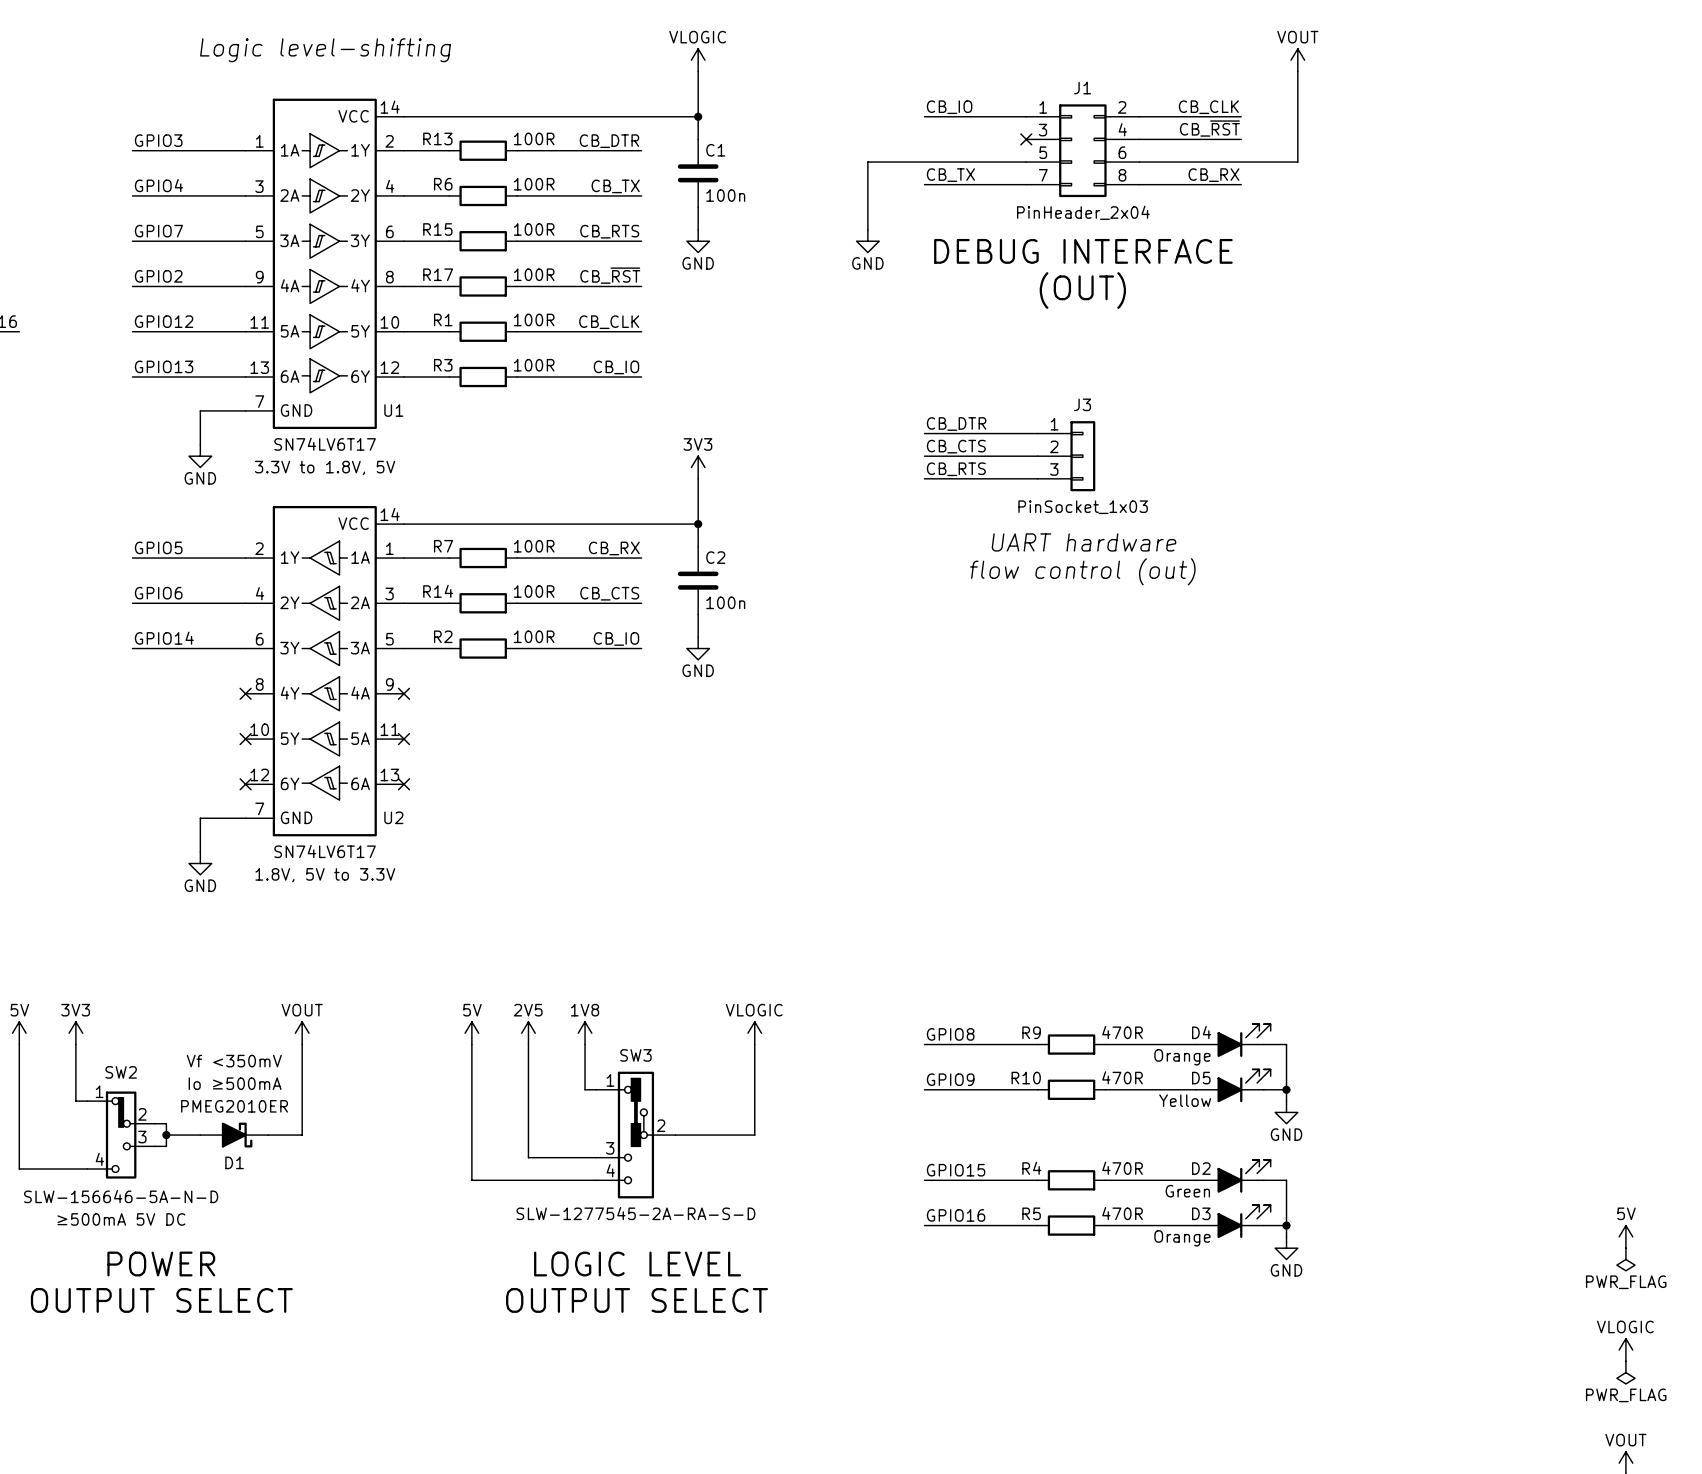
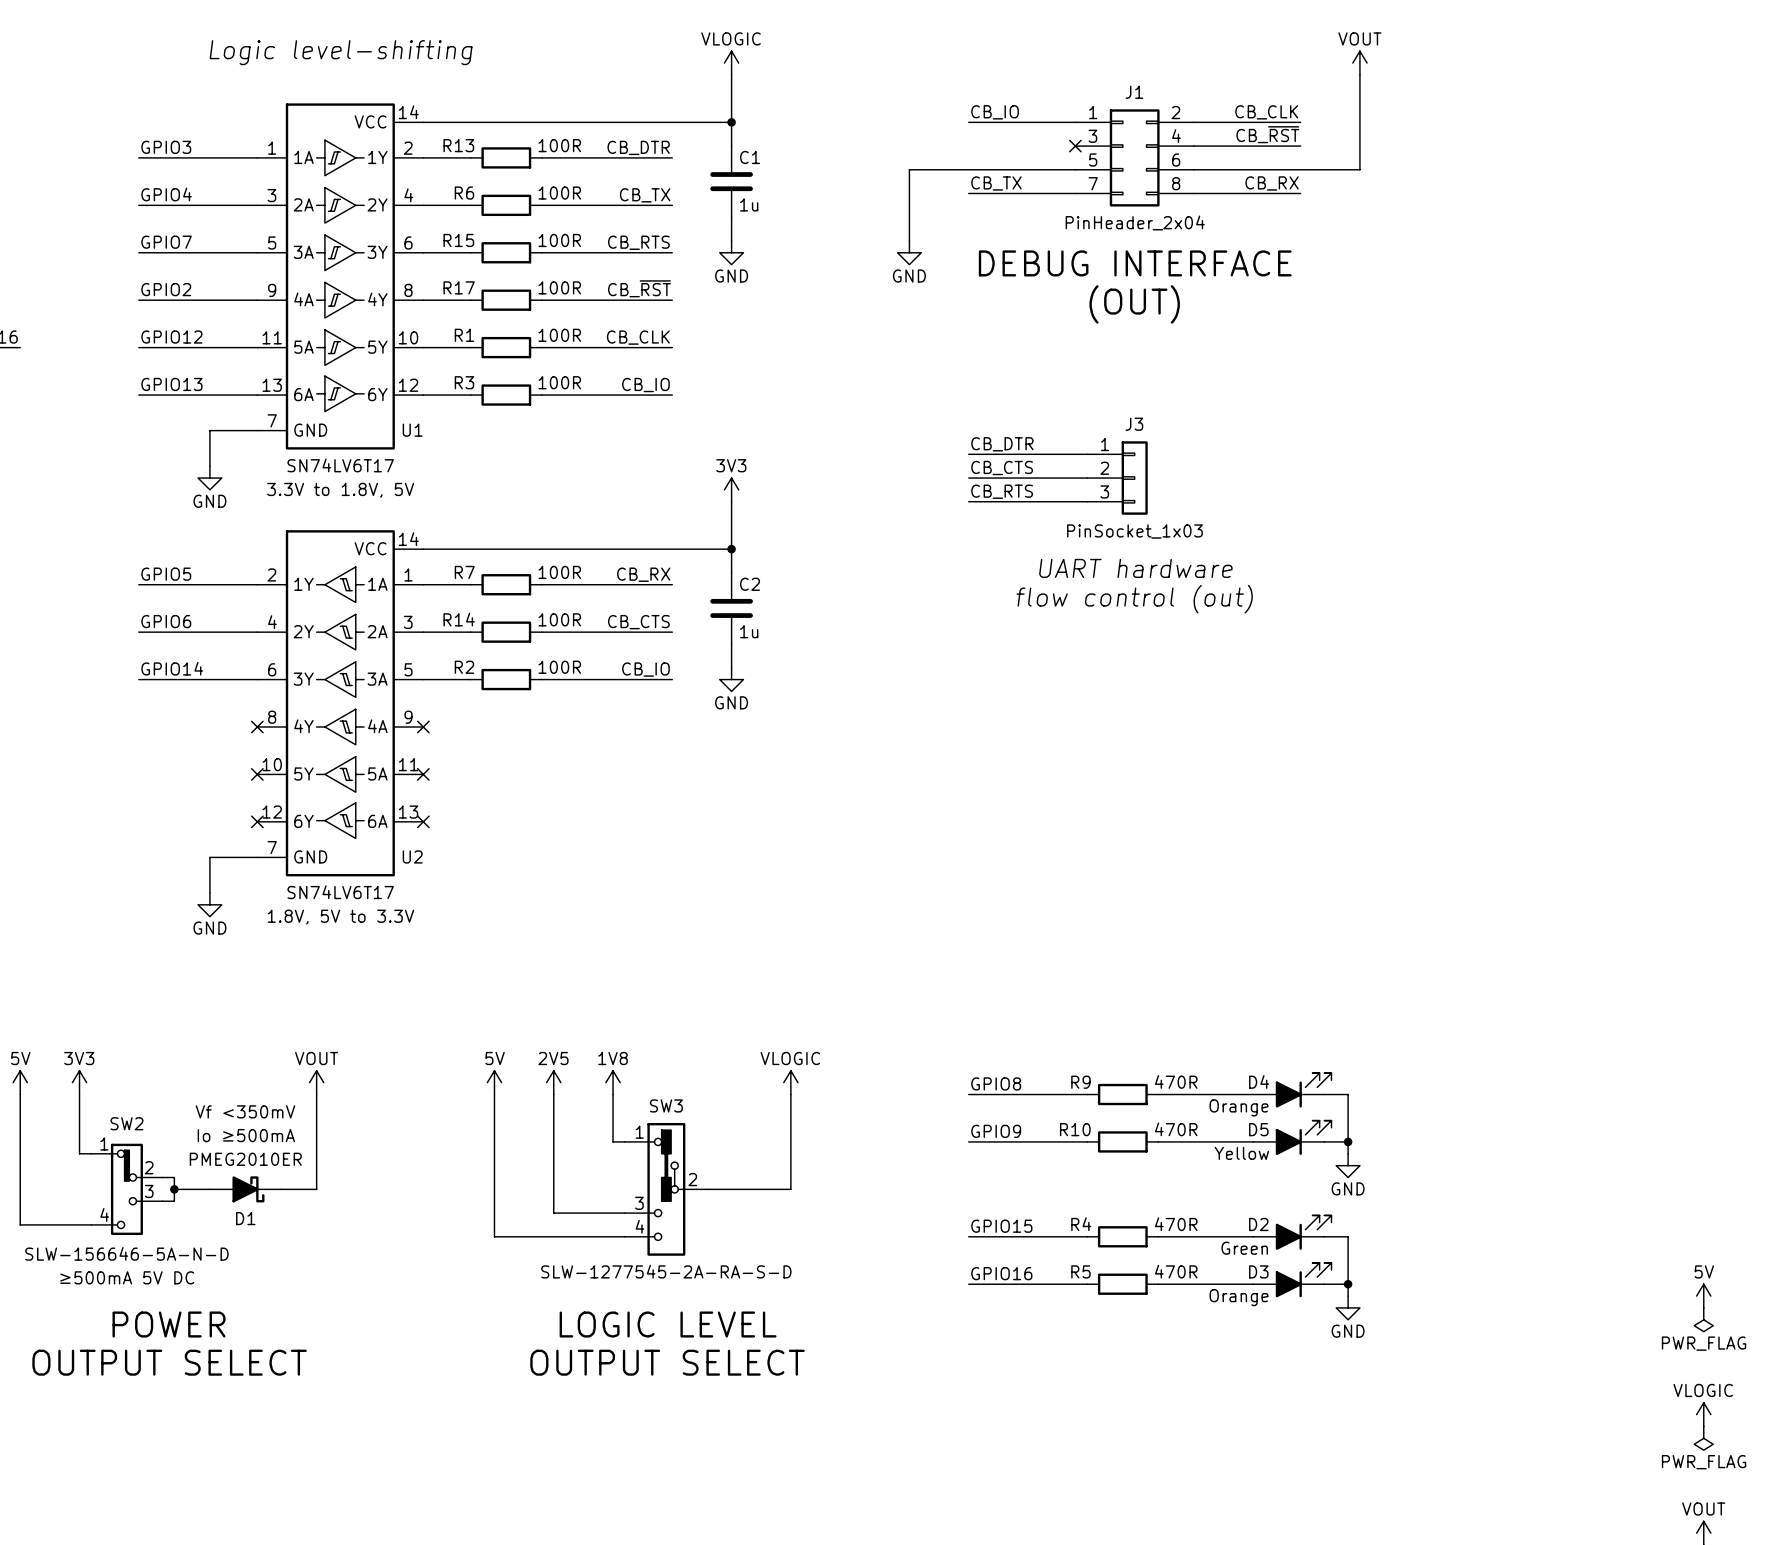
C1 value: 100n (725, 195) -> 1u (749, 204)
C2 value: 100n (725, 602) -> 1u (749, 631)

